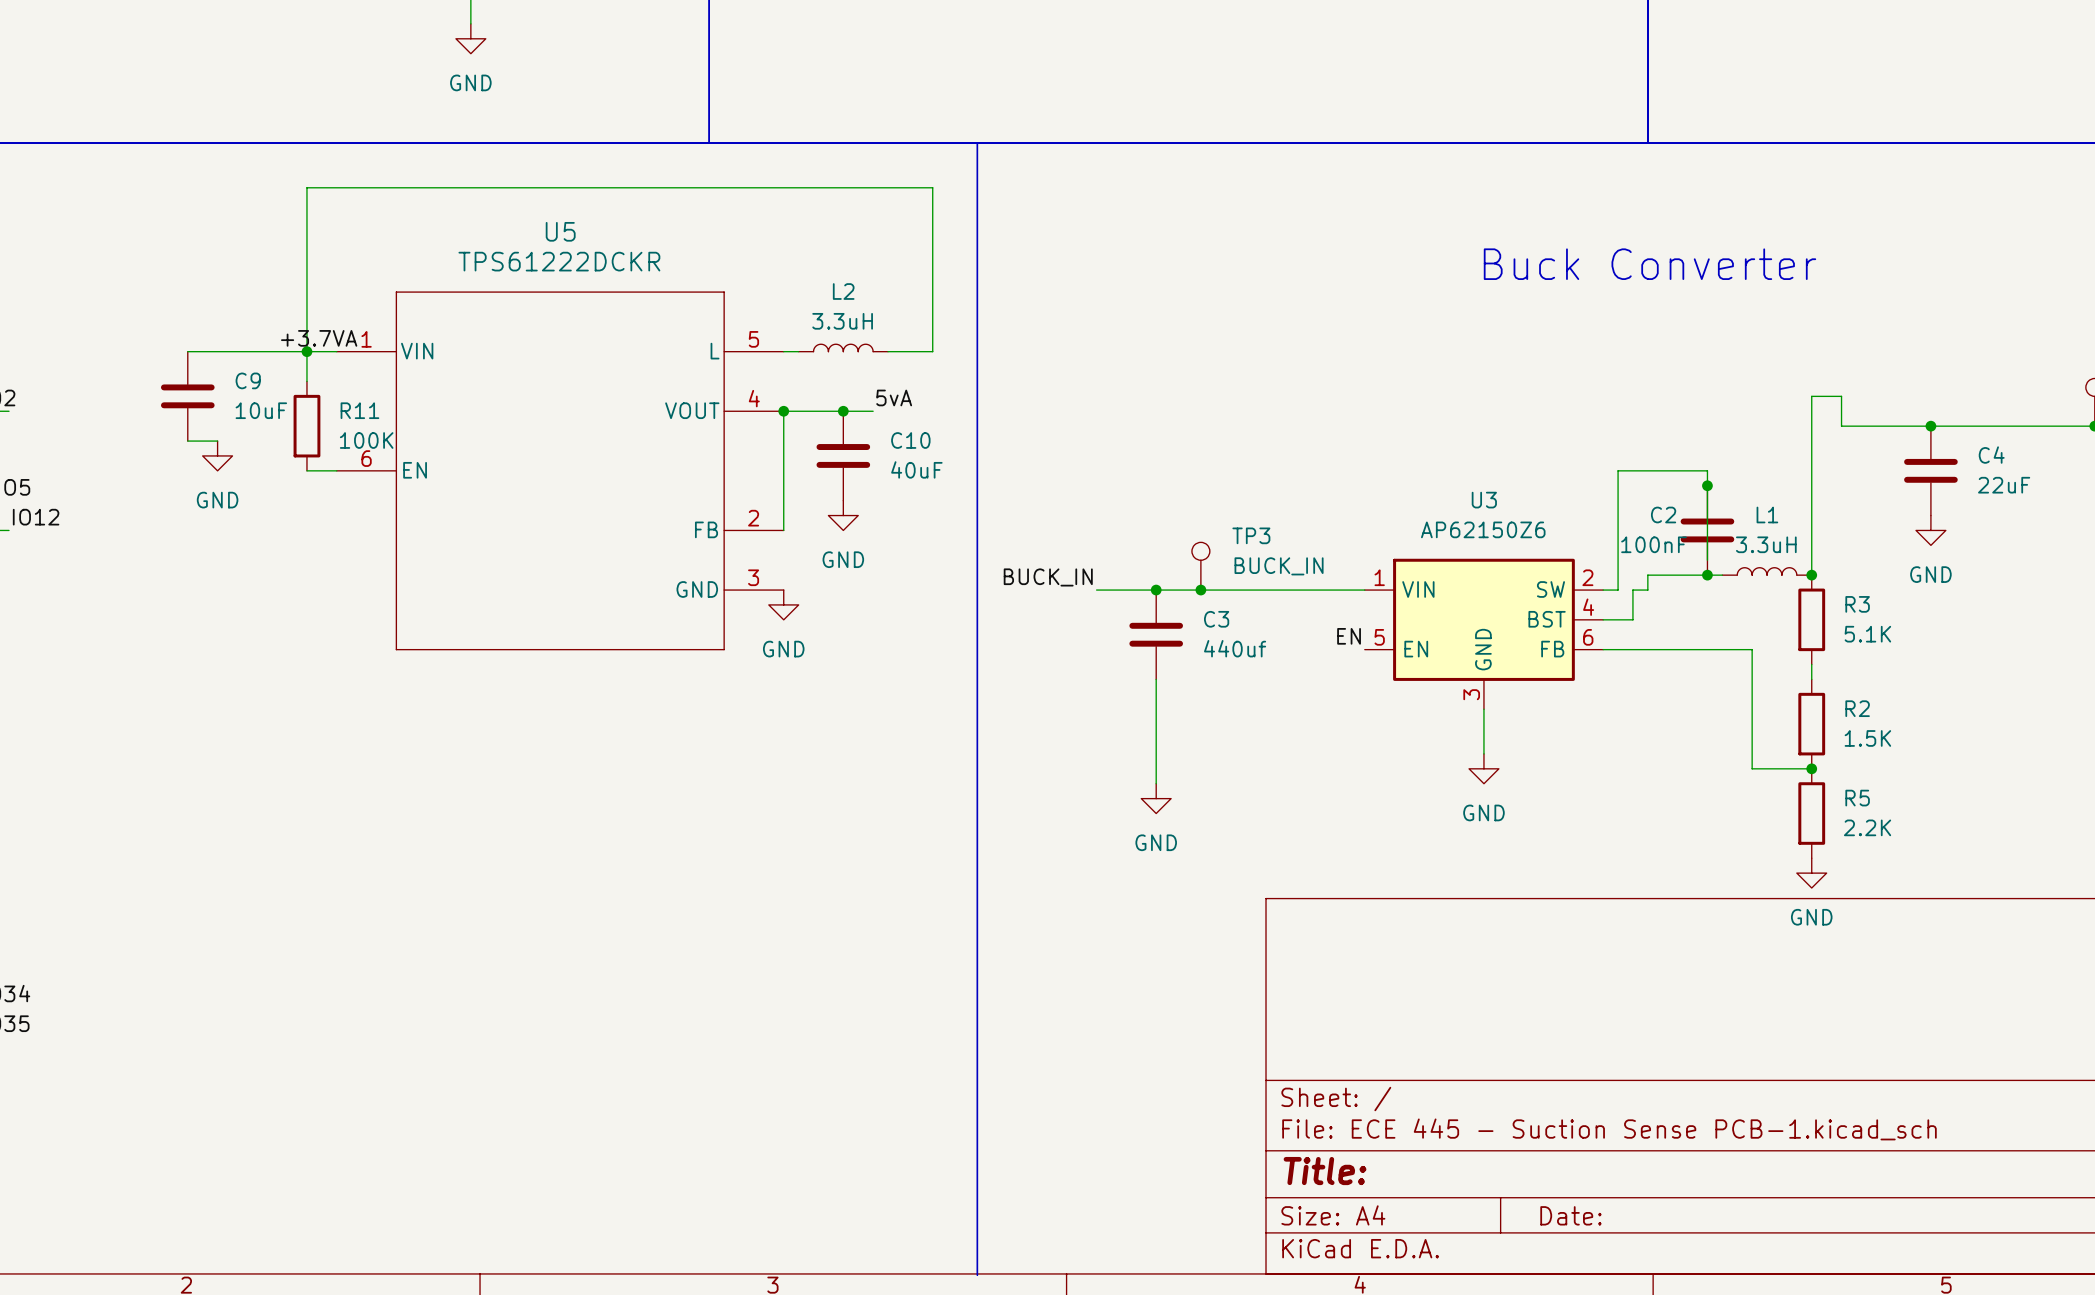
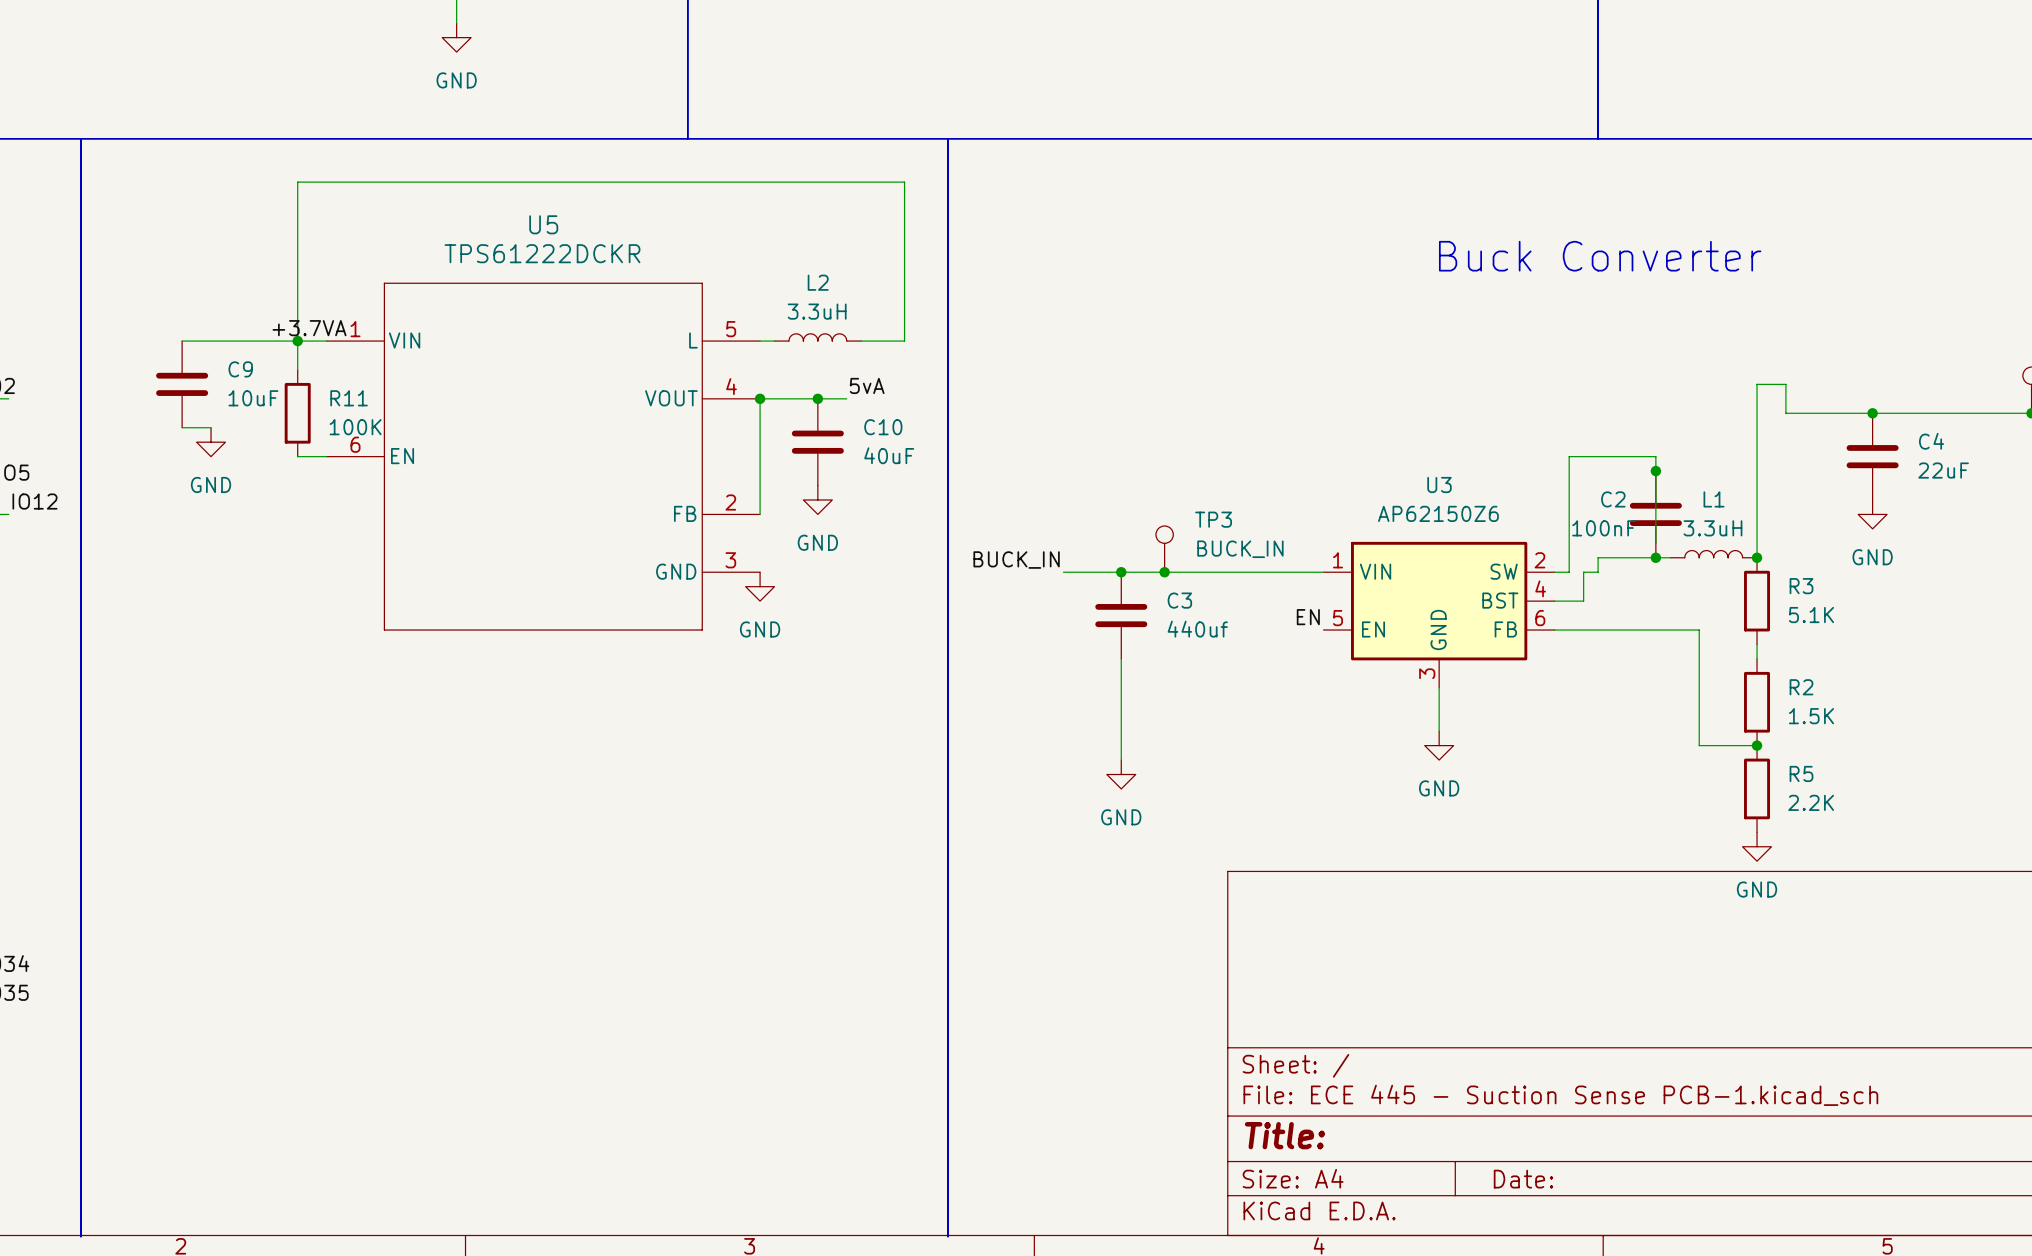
line: none -> (80, 138) (80, 1236)

